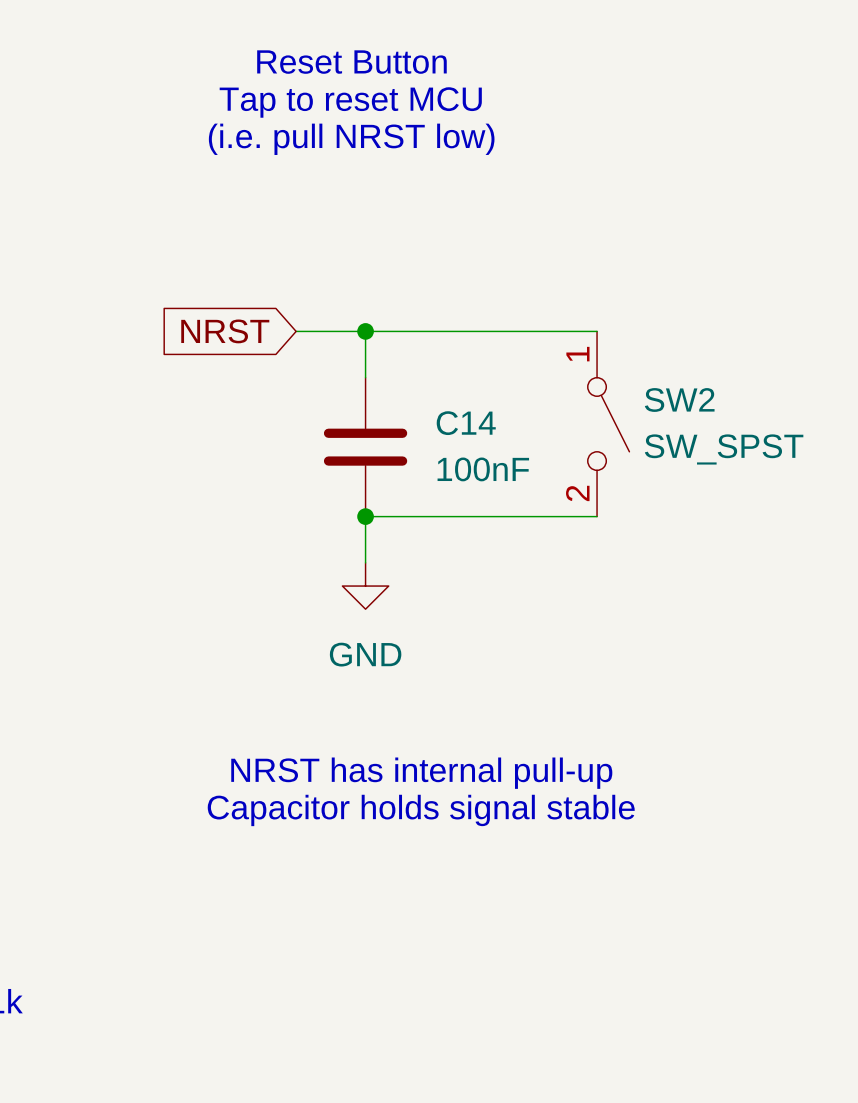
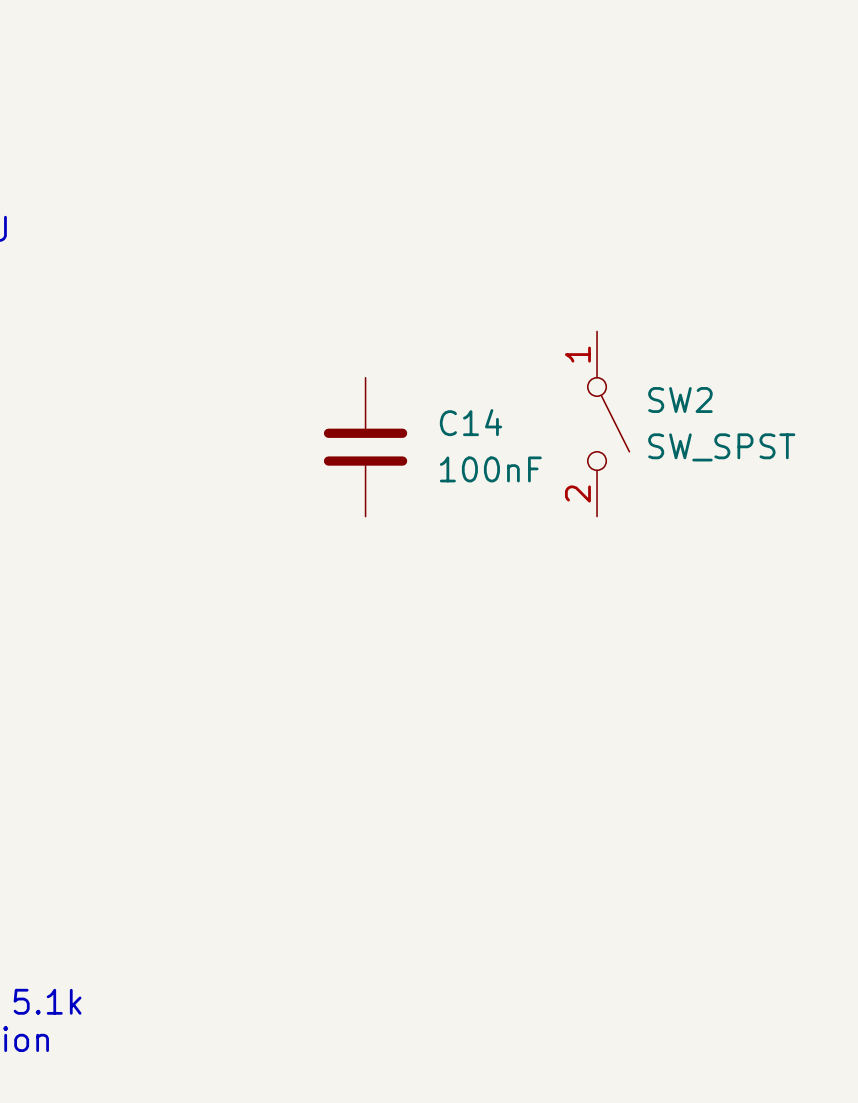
text: Reset Button (351, 62) -> none
text: Tap to reset MCU (350, 102) -> none
text: (i.e. pull NRST low) (351, 139) -> none
global label: NRST (225, 331) -> none
wire: (296, 331) (597, 331) -> none
wire: (365, 331) (365, 377) -> none
junction: (365, 331) -> none
junction: (365, 516) -> none
wire: (597, 516) (365, 516) (365, 562) -> none
power symbol: GND (365, 586) -> none
text: NRST has internal pull-up (421, 773) -> none
text: Capacitor holds signal stable (421, 810) -> none

